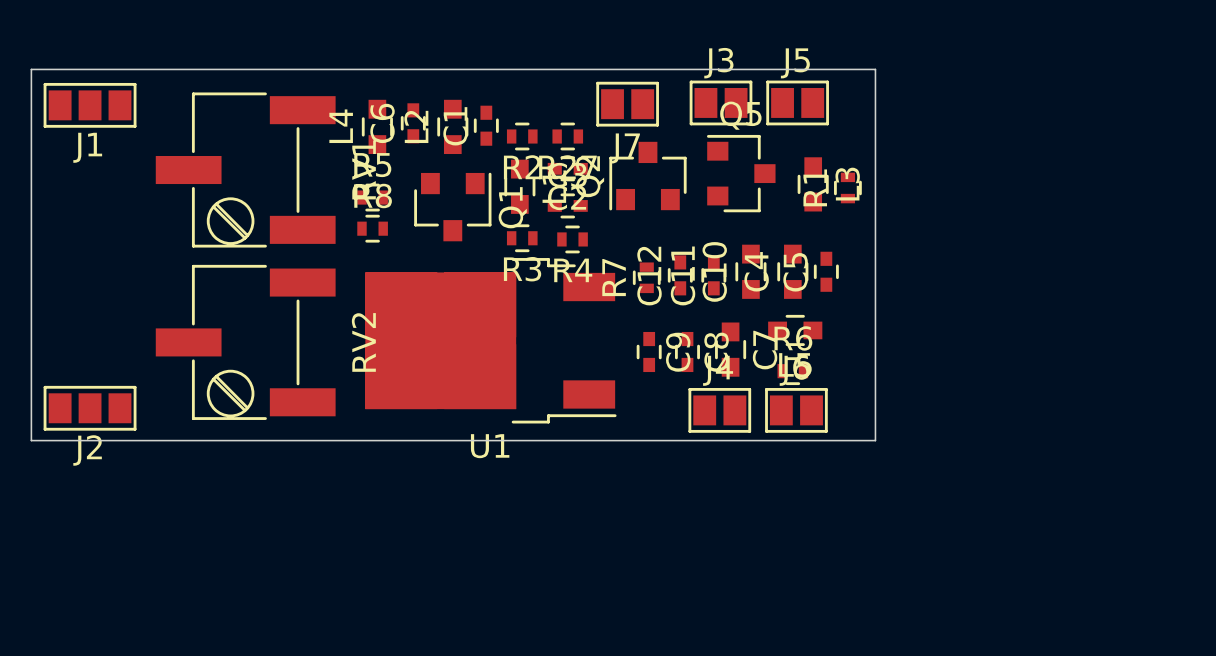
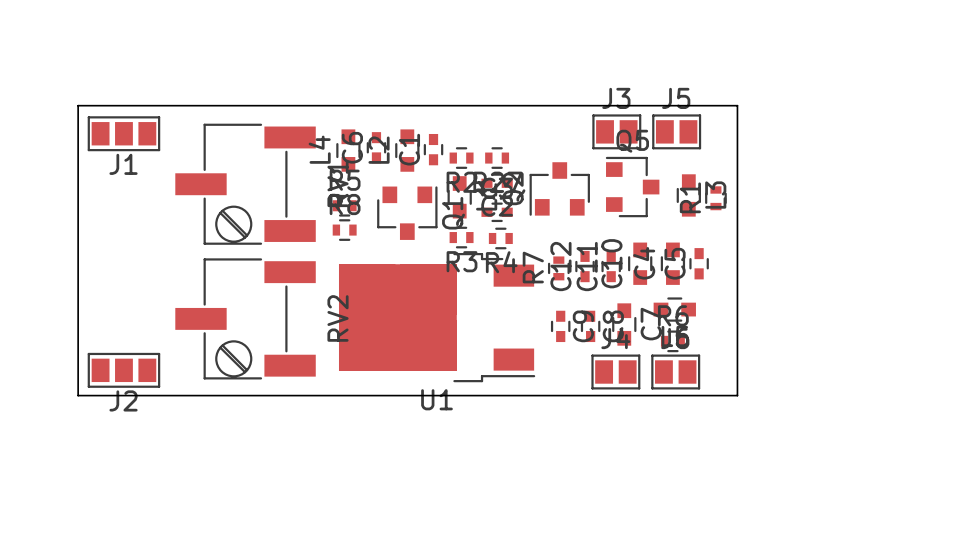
J7: (627, 104) -> none

